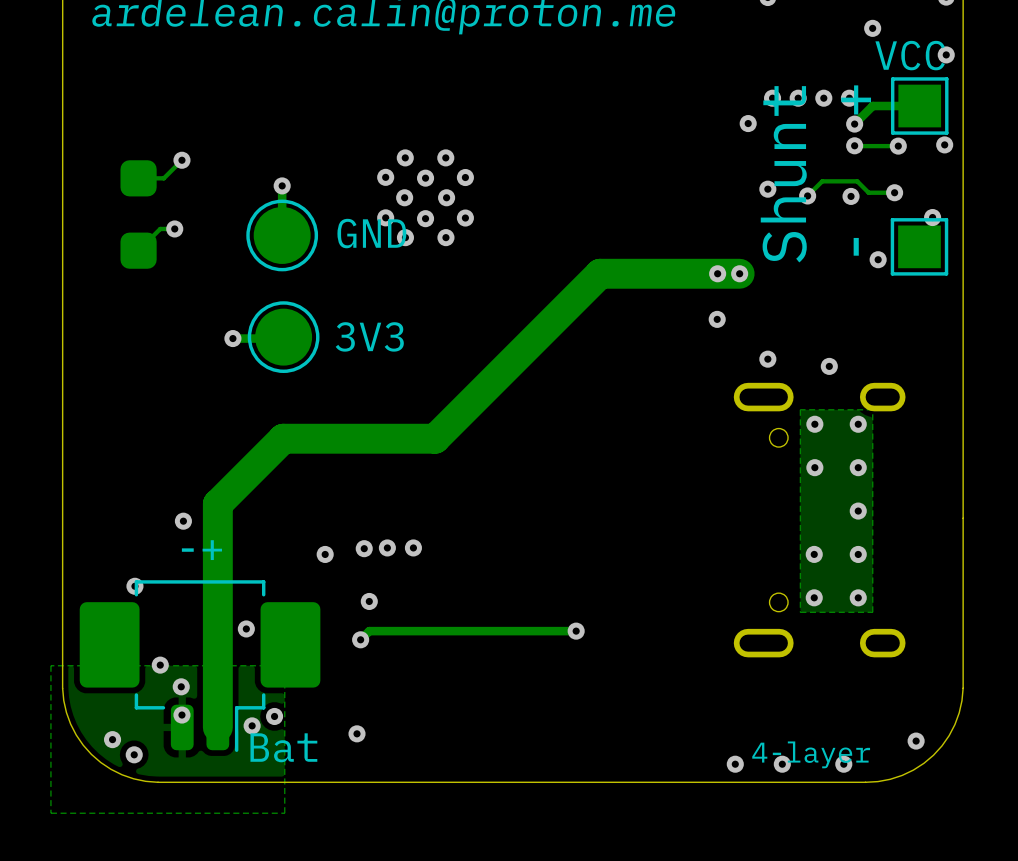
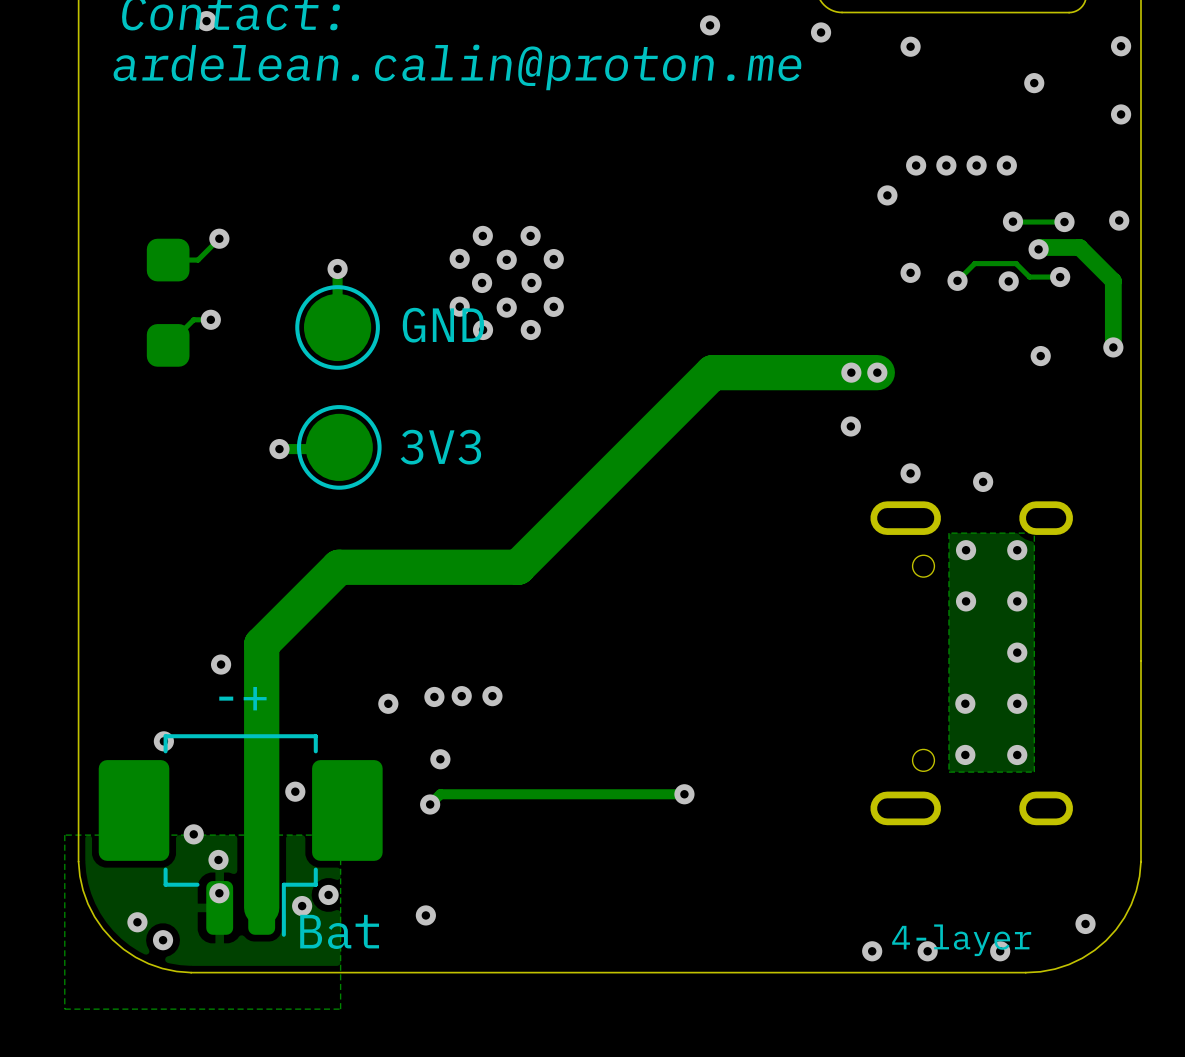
text: VCC (910, 55) -> none
track: (919, 106) (872, 106) (854, 124) -> none
part: (919, 106) -> none
via: (854, 124) -> none
track: none -> (1038, 249) (1040, 247) (1079, 247) (1113, 281) (1113, 347)
via: none -> (1038, 249)
text: - + (856, 170) -> none
text: Shunt (783, 174) -> none
via position: (932, 217) -> (1113, 347)
part: (919, 246) -> none

